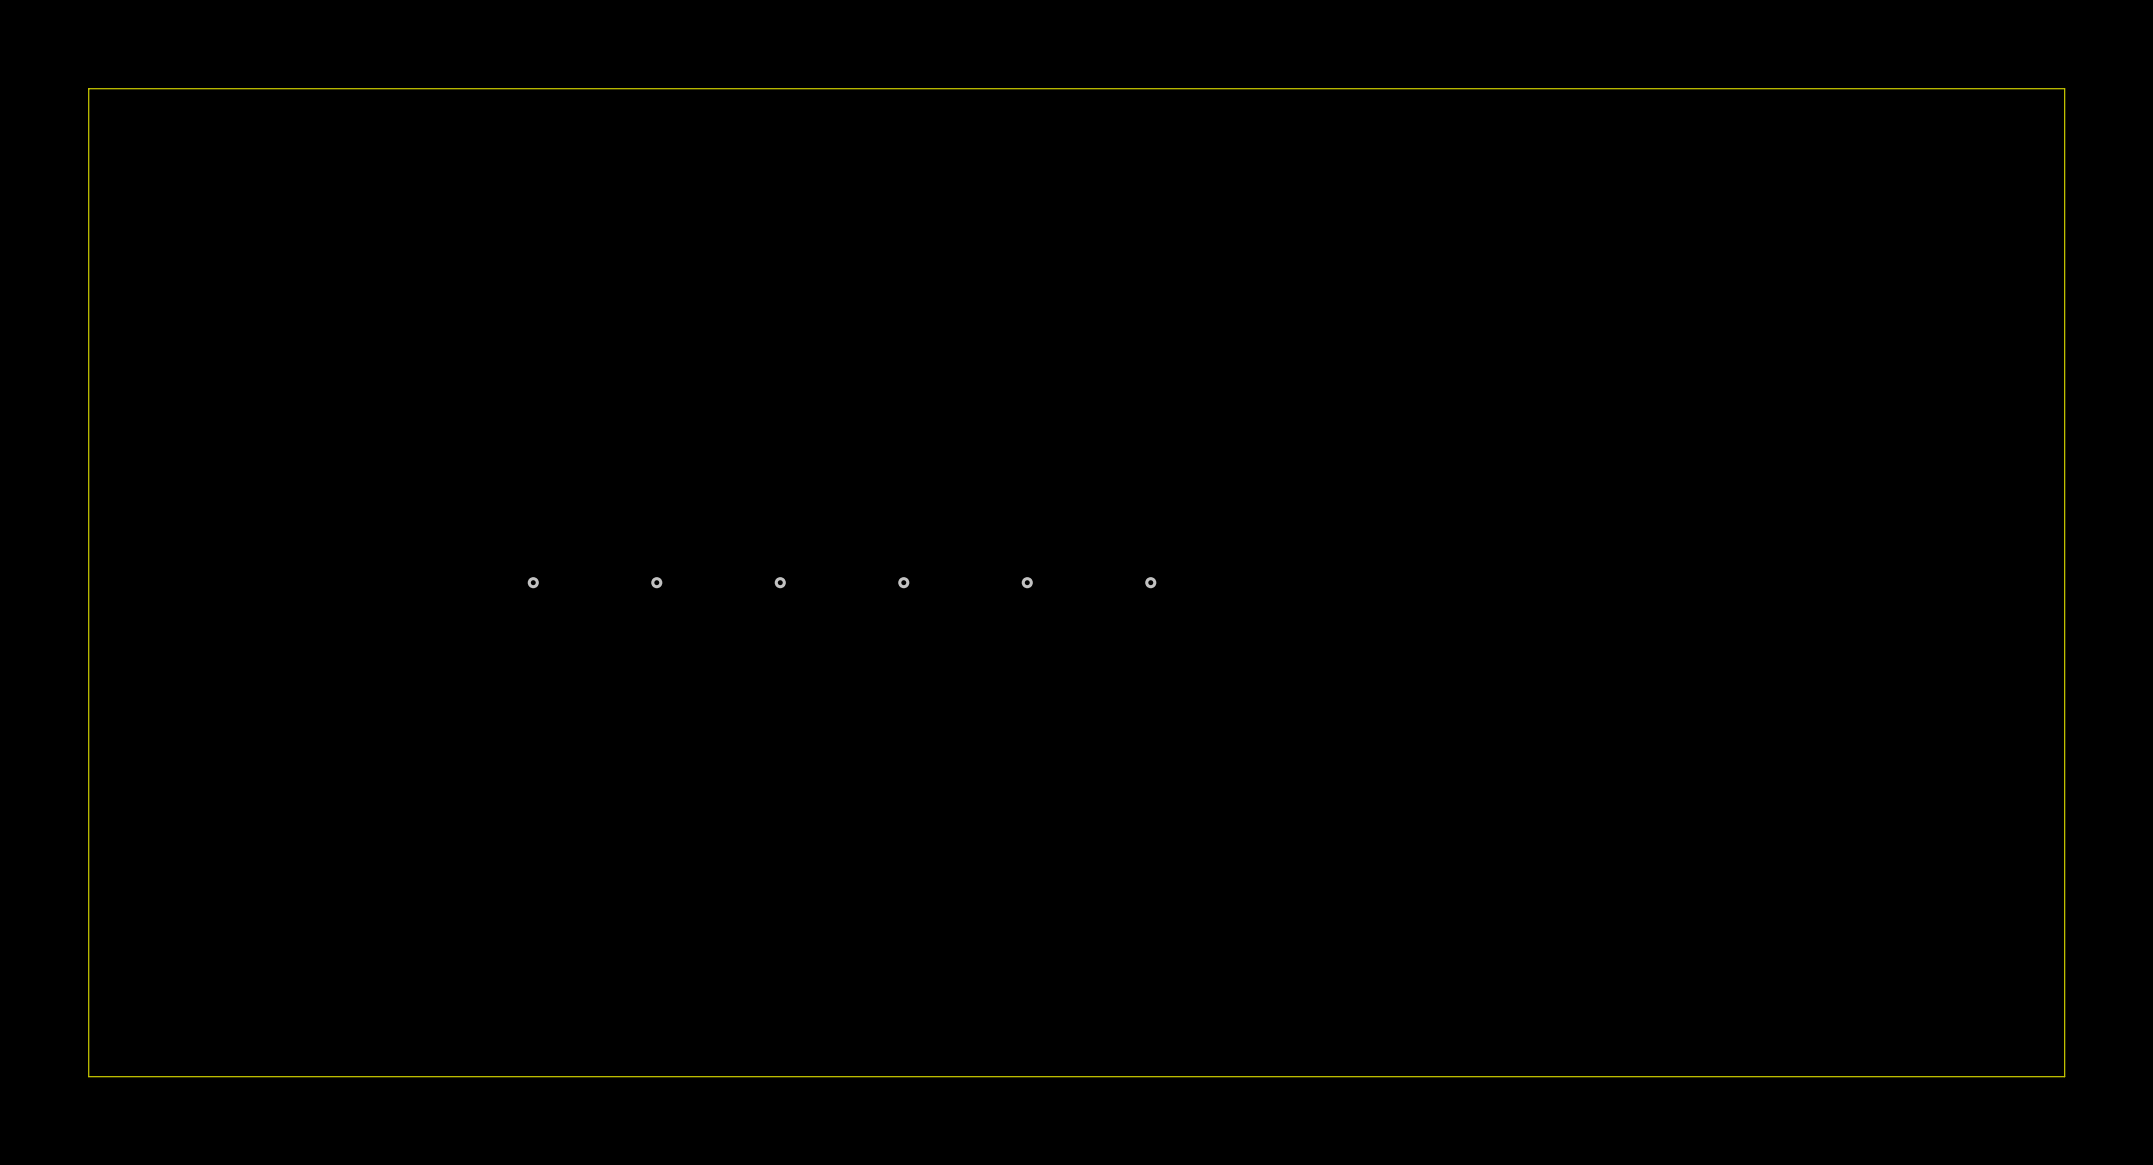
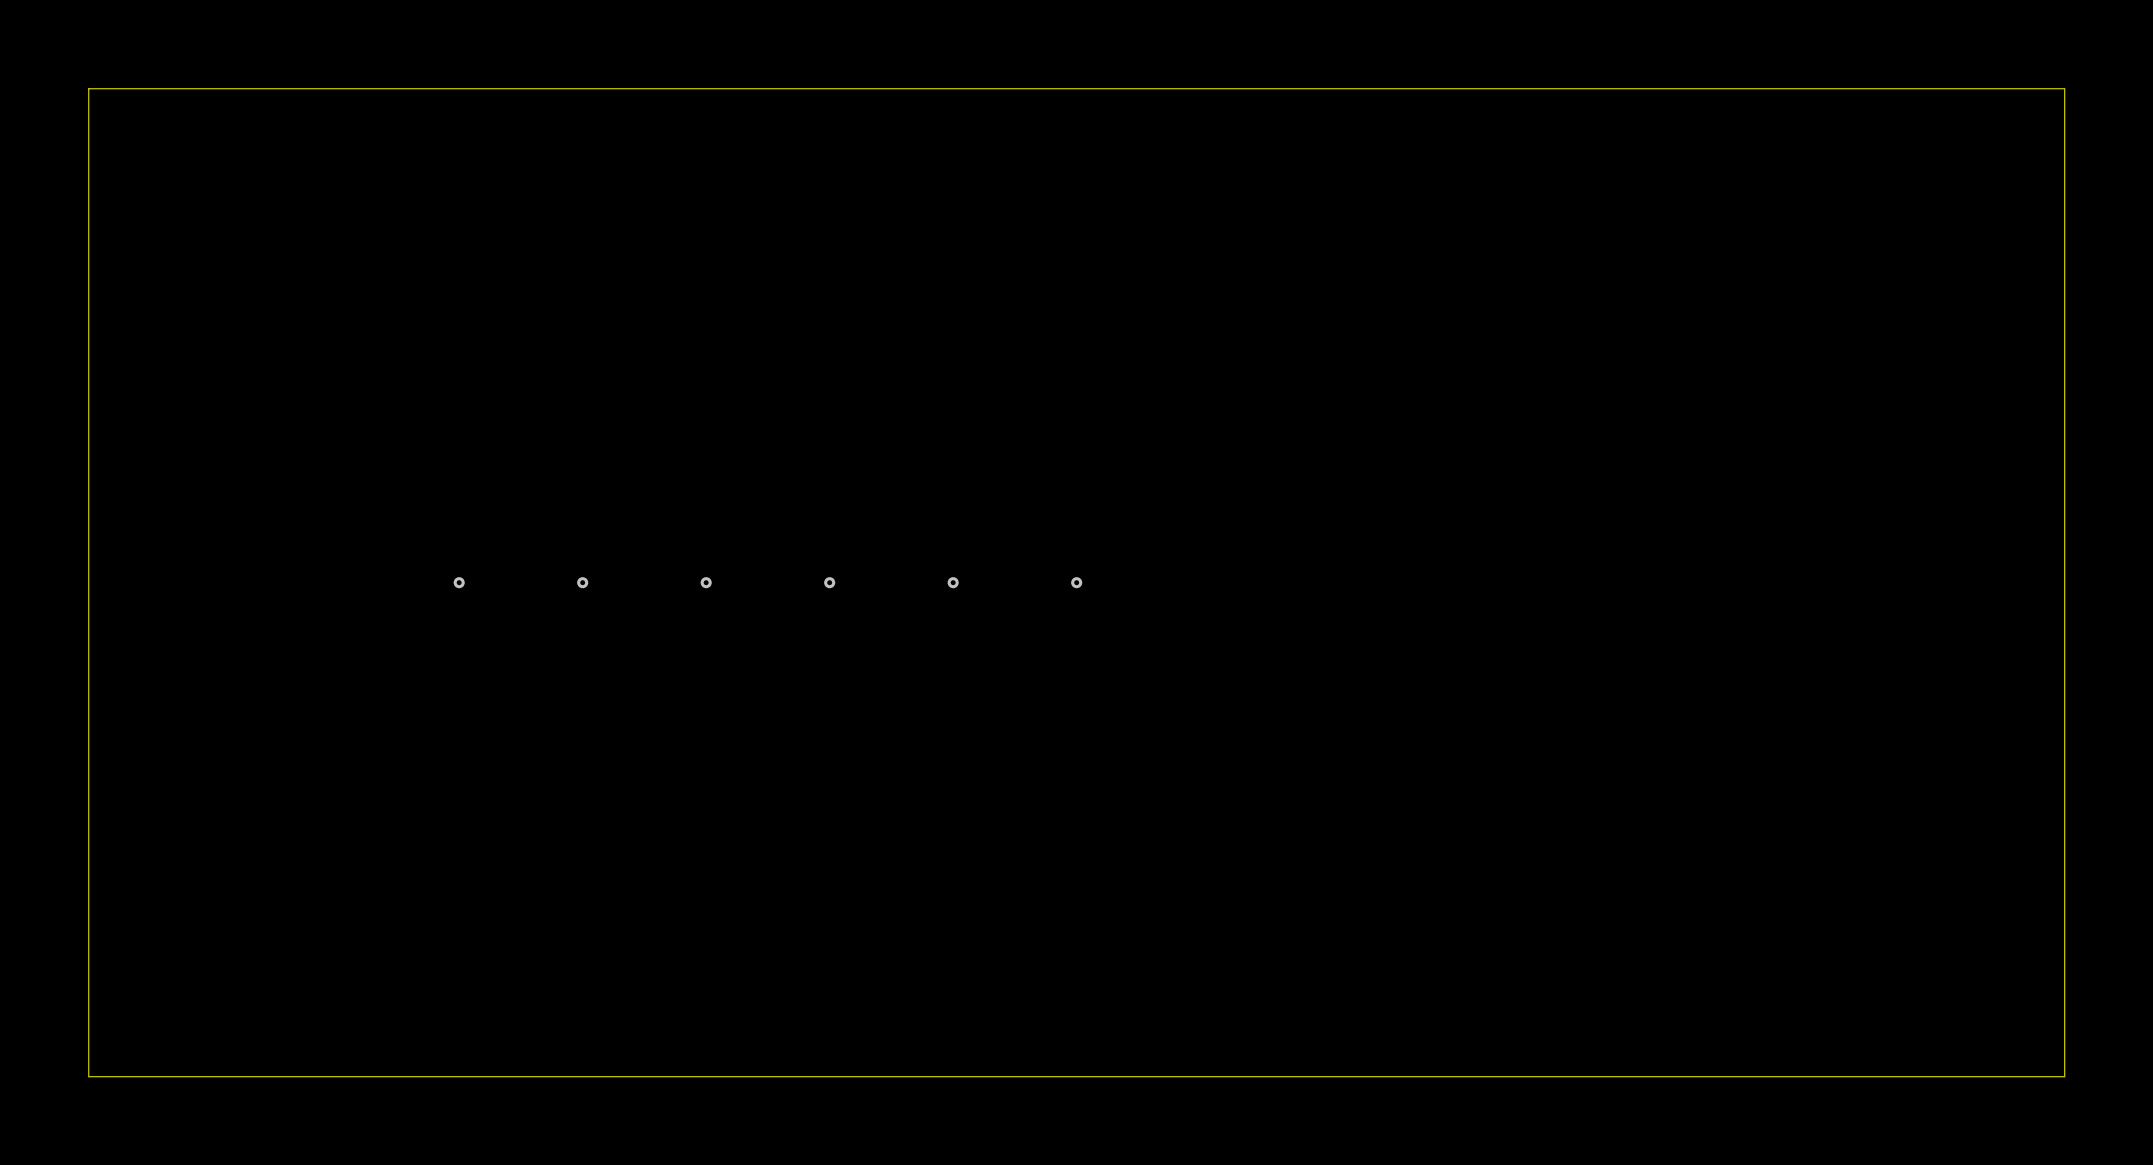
via: none -> (459, 582)
via: (533, 582) -> none
via: none -> (582, 582)
via: (656, 582) -> none
via: none -> (706, 582)
via: (780, 582) -> none
via: none -> (829, 582)
via: (903, 582) -> none
via: none -> (953, 582)
via: (1027, 582) -> none
via: none -> (1076, 582)
via: (1150, 582) -> none

